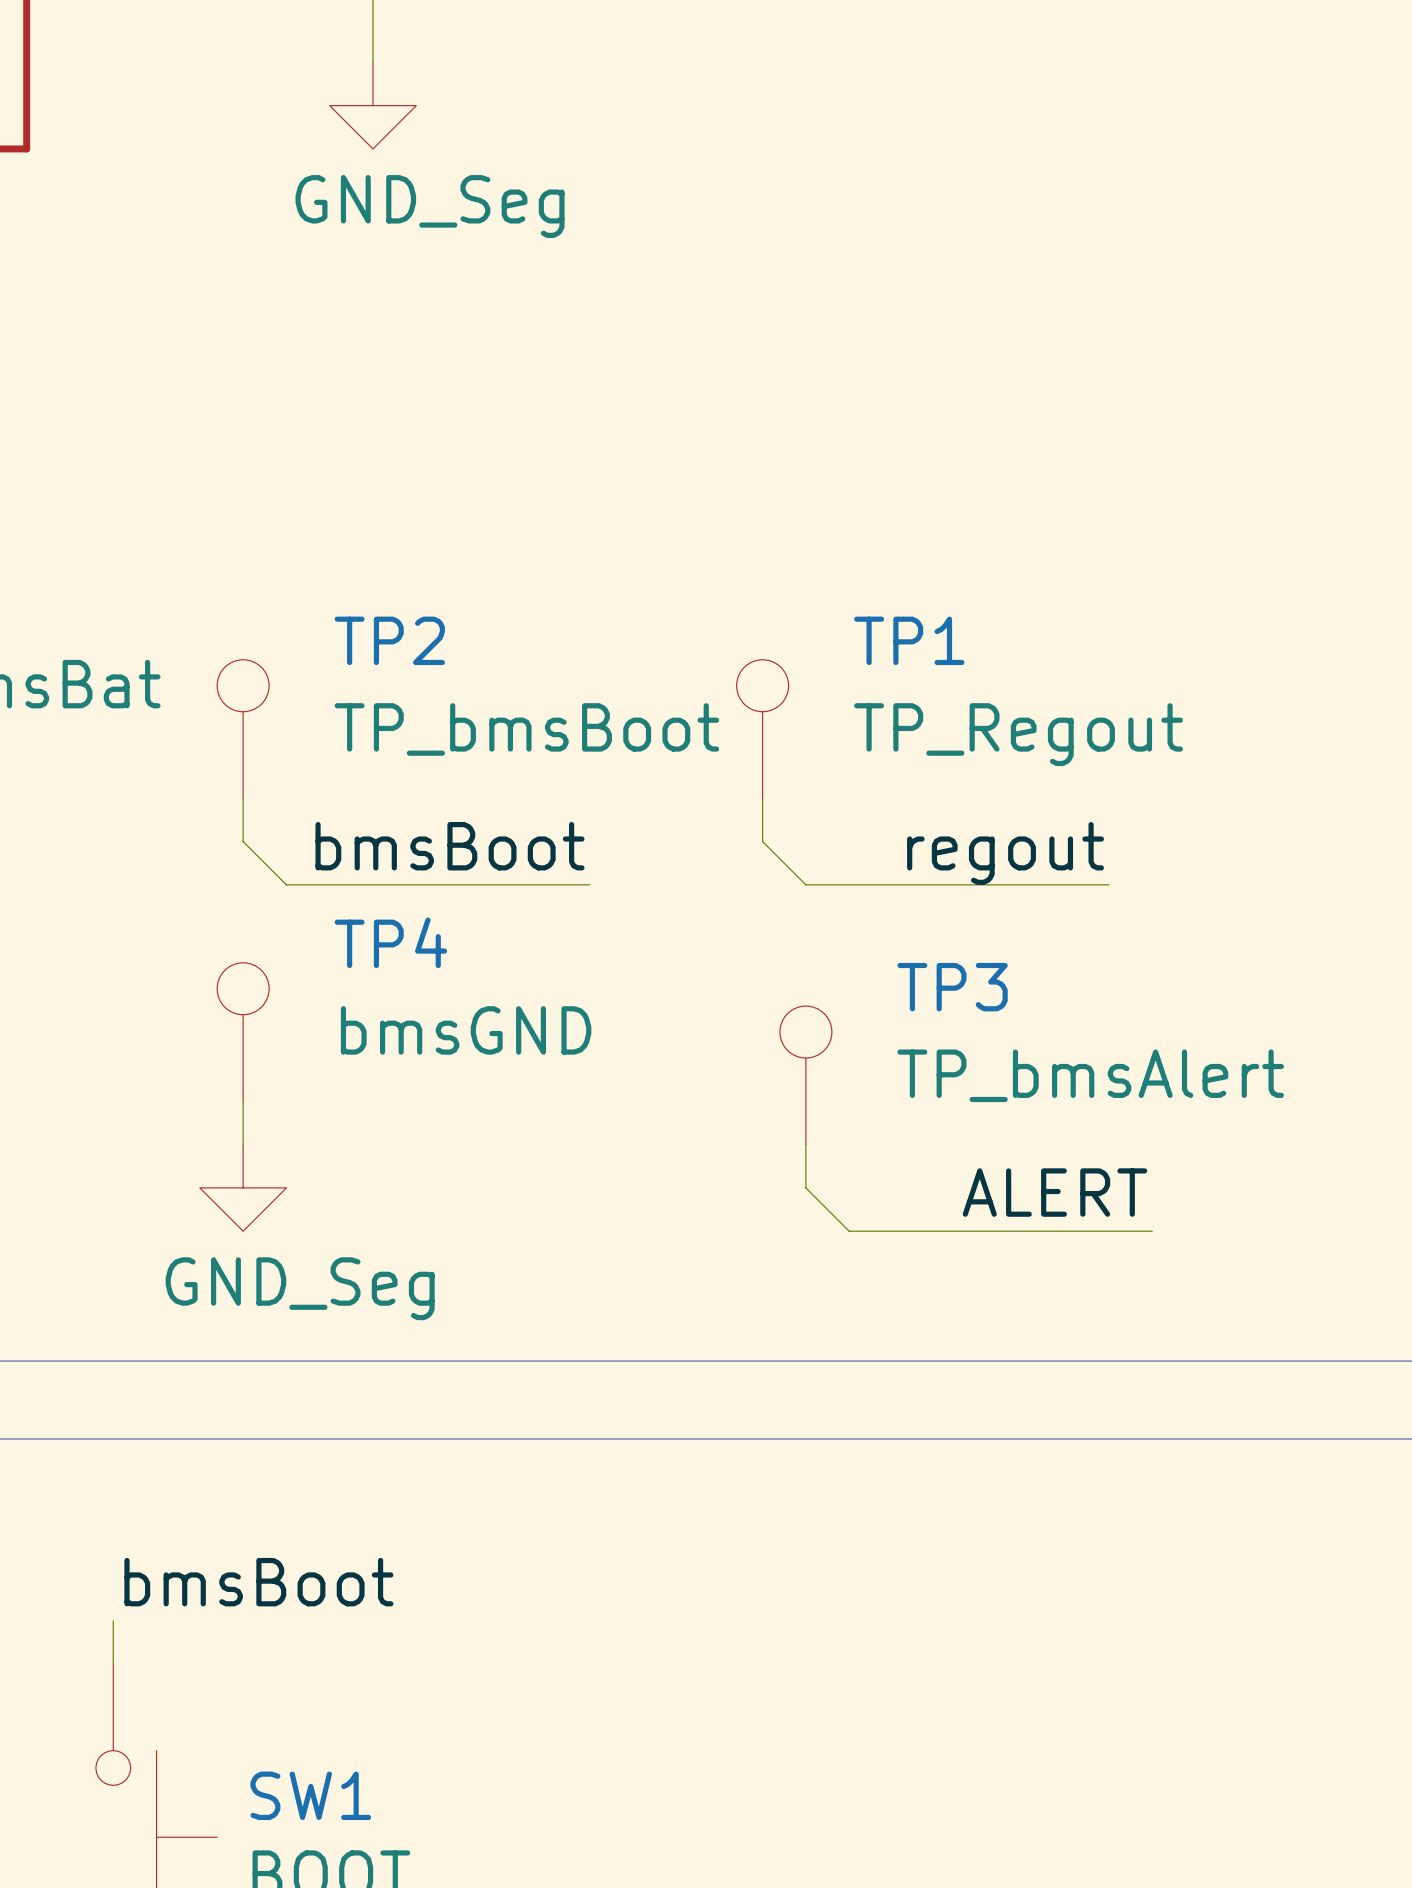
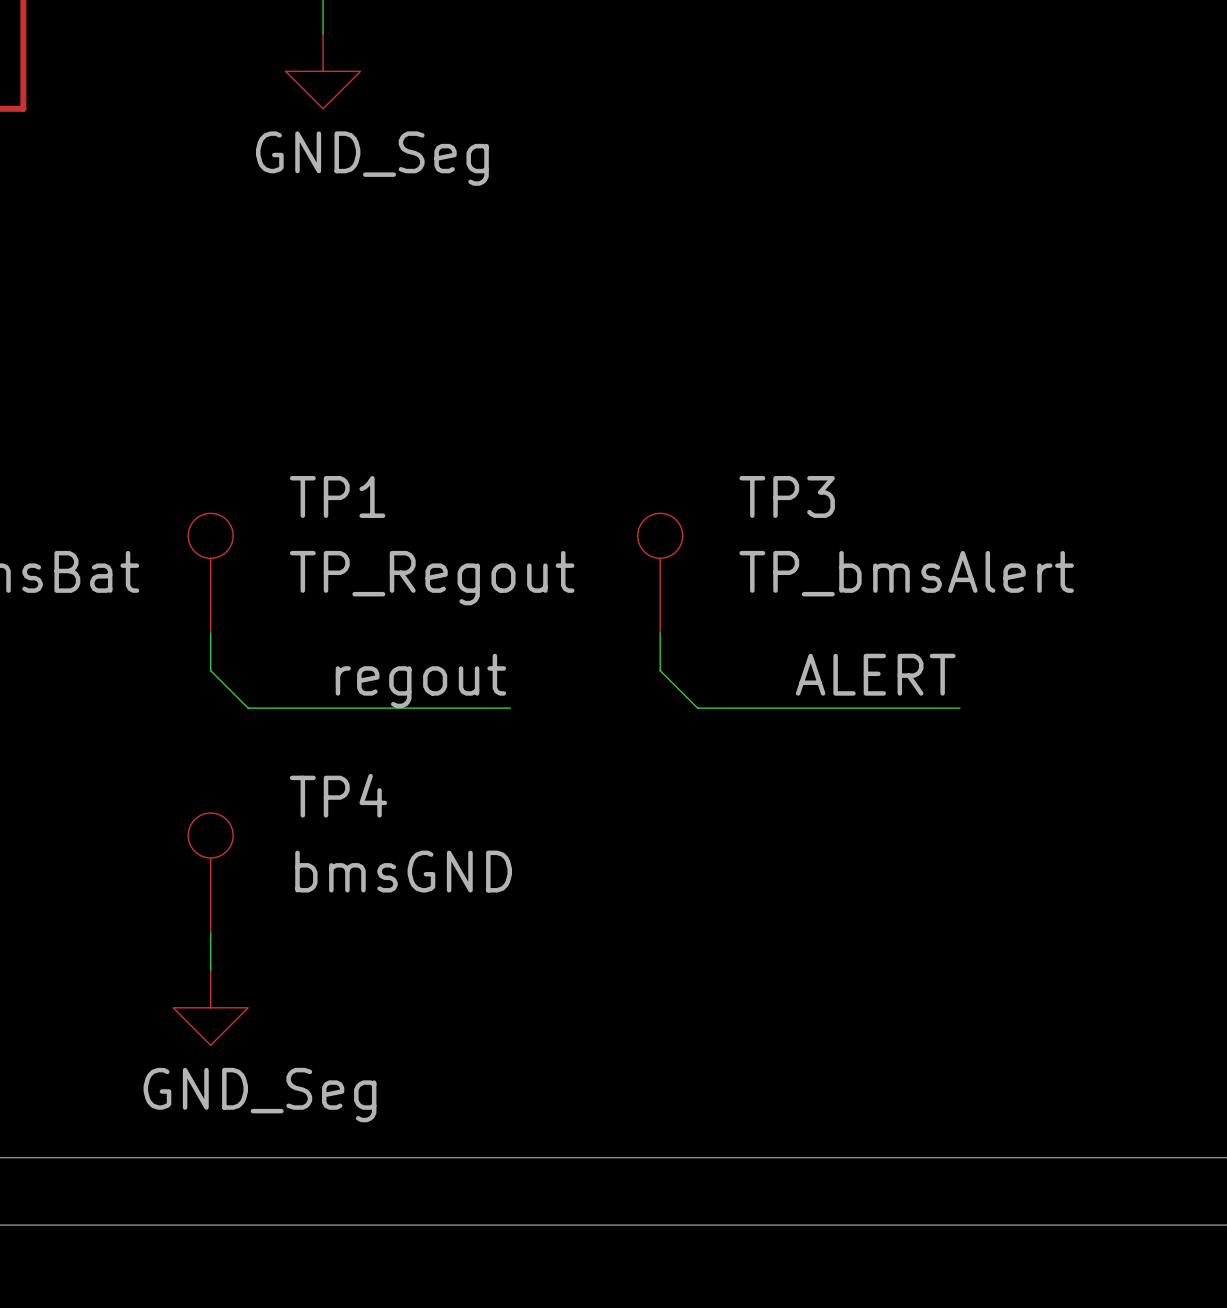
TP2: TP_bmsBoot (243, 729) -> none
TP1 position: (762, 729) -> (210, 573)
wire: (243, 798) (243, 841) (286, 884) (589, 884) -> (210, 633) (210, 670) (248, 708) (510, 708)
wire: (762, 798) (762, 841) (805, 884) (1108, 884) -> (660, 633) (660, 670) (697, 708) (959, 708)
label: bmsBoot (449, 846) -> none
label position: regout (1005, 853) -> regout (420, 680)
TP3 position: (805, 1075) -> (660, 573)
wire: (805, 1144) (805, 1187) (849, 1231) (1152, 1231) -> none
label position: ALERT (1055, 1192) -> ALERT (875, 674)

